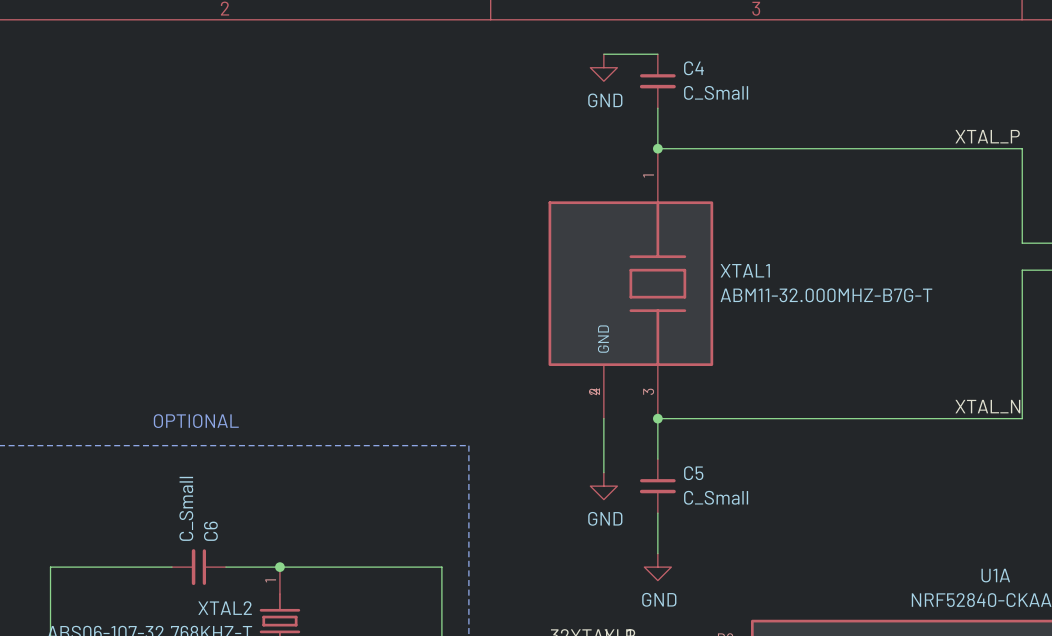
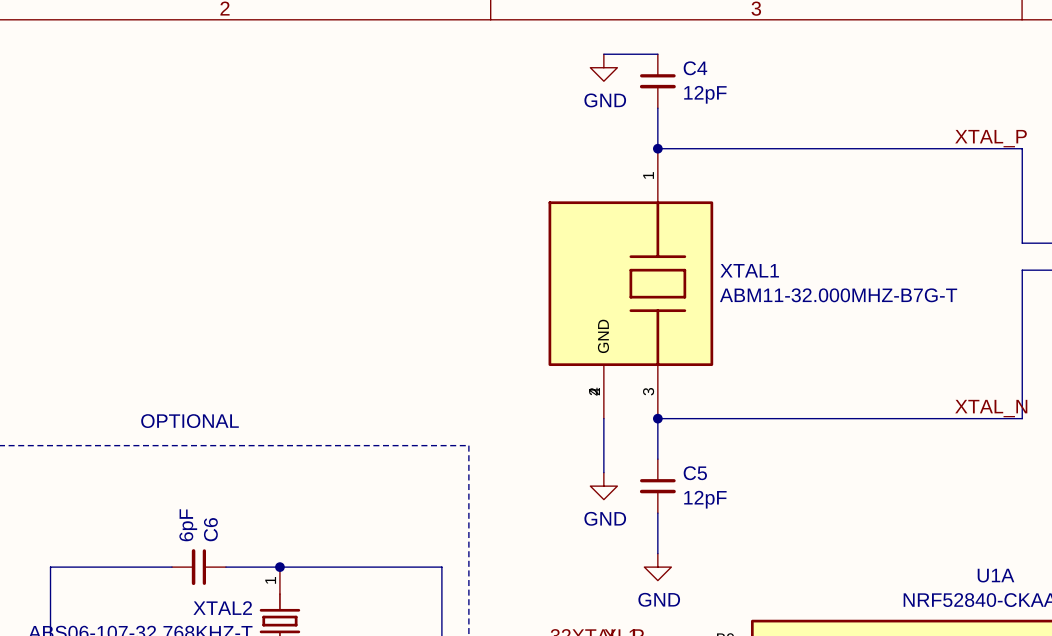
C4 value: C_Small (716, 92) -> 12pF (705, 94)
C5 value: C_Small (716, 497) -> 12pF (705, 499)
C6 value: C_Small (186, 508) -> 6pF (188, 525)

